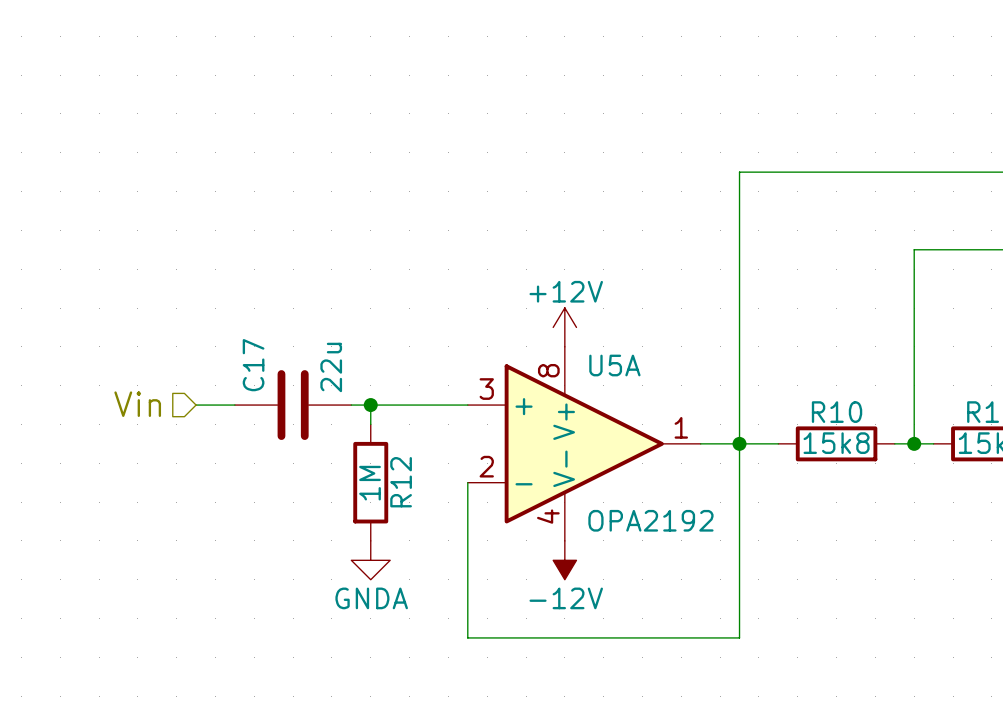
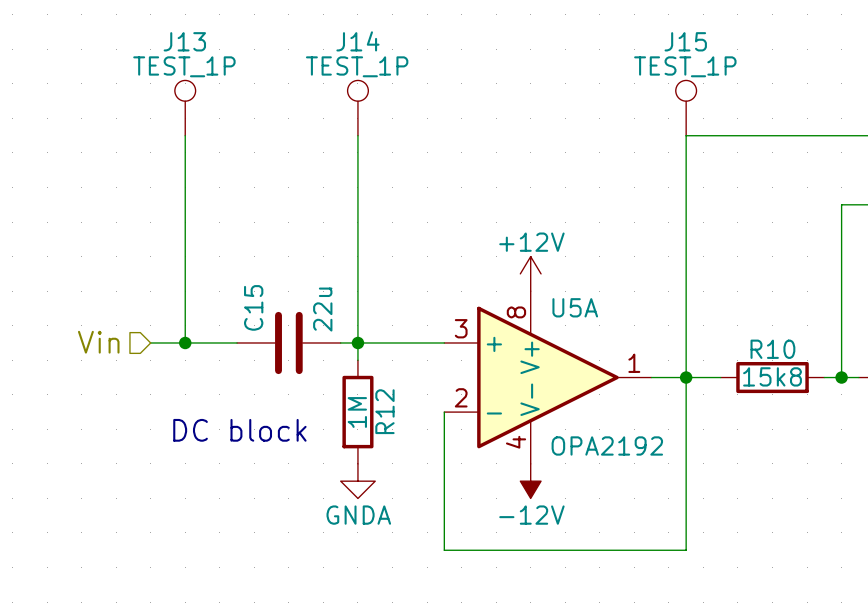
J13: none -> TEST_1P (185, 108)
J14: none -> TEST_1P (357, 108)
J15: none -> TEST_1P (686, 108)
wire: none -> (185, 135) (185, 342)
wire: none -> (357, 135) (357, 342)
C17 name: C17 (253, 365) -> C15 (253, 307)
hierarchical label position: Vin (137, 404) -> Vin (98, 342)
wire: none -> (150, 342) (202, 342)
junction: none -> (185, 342)
text: none -> DC block (239, 430)

